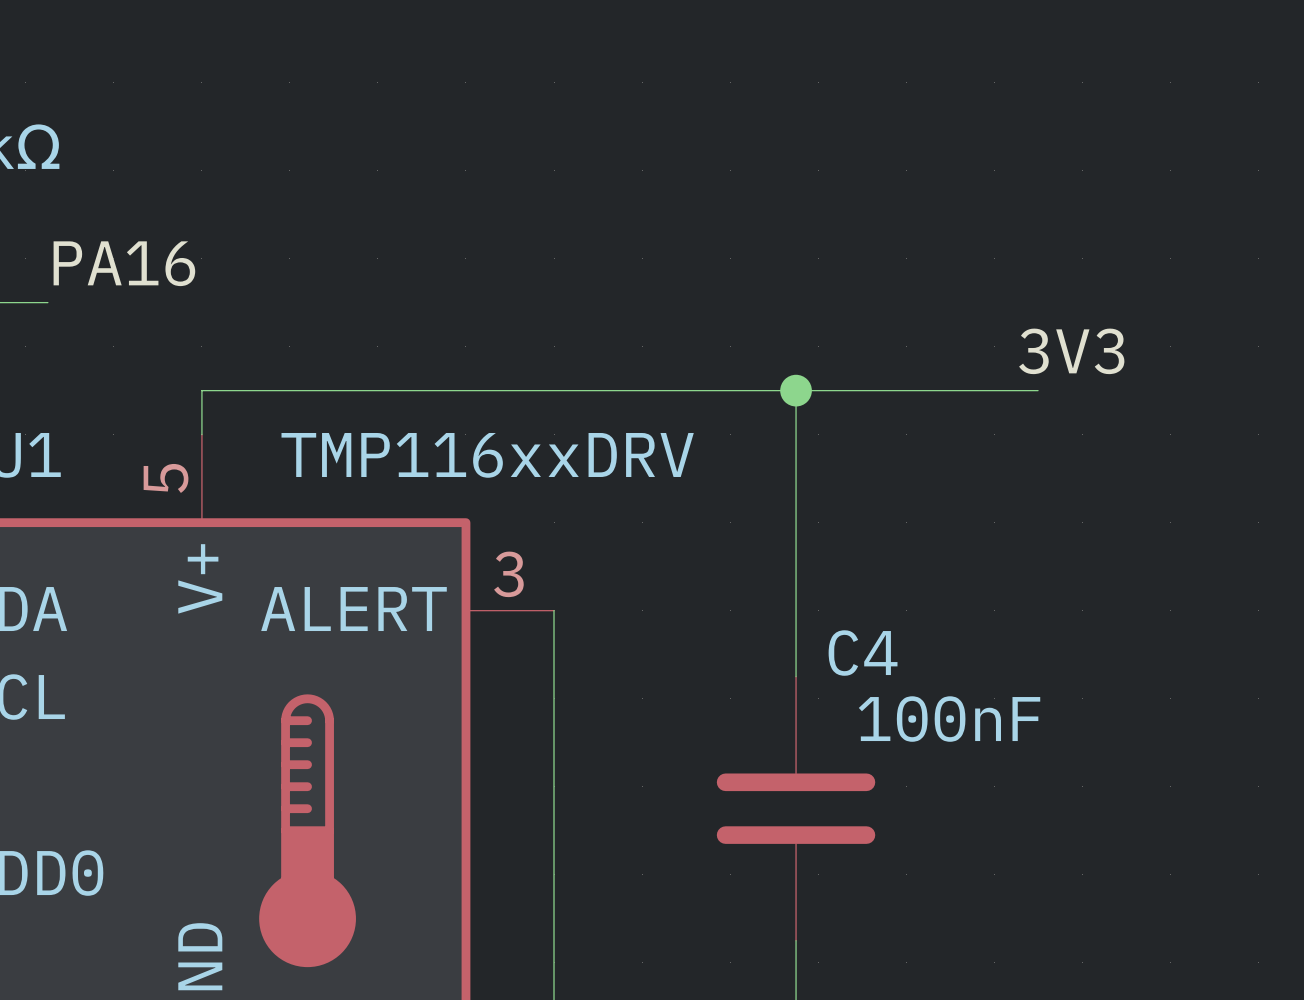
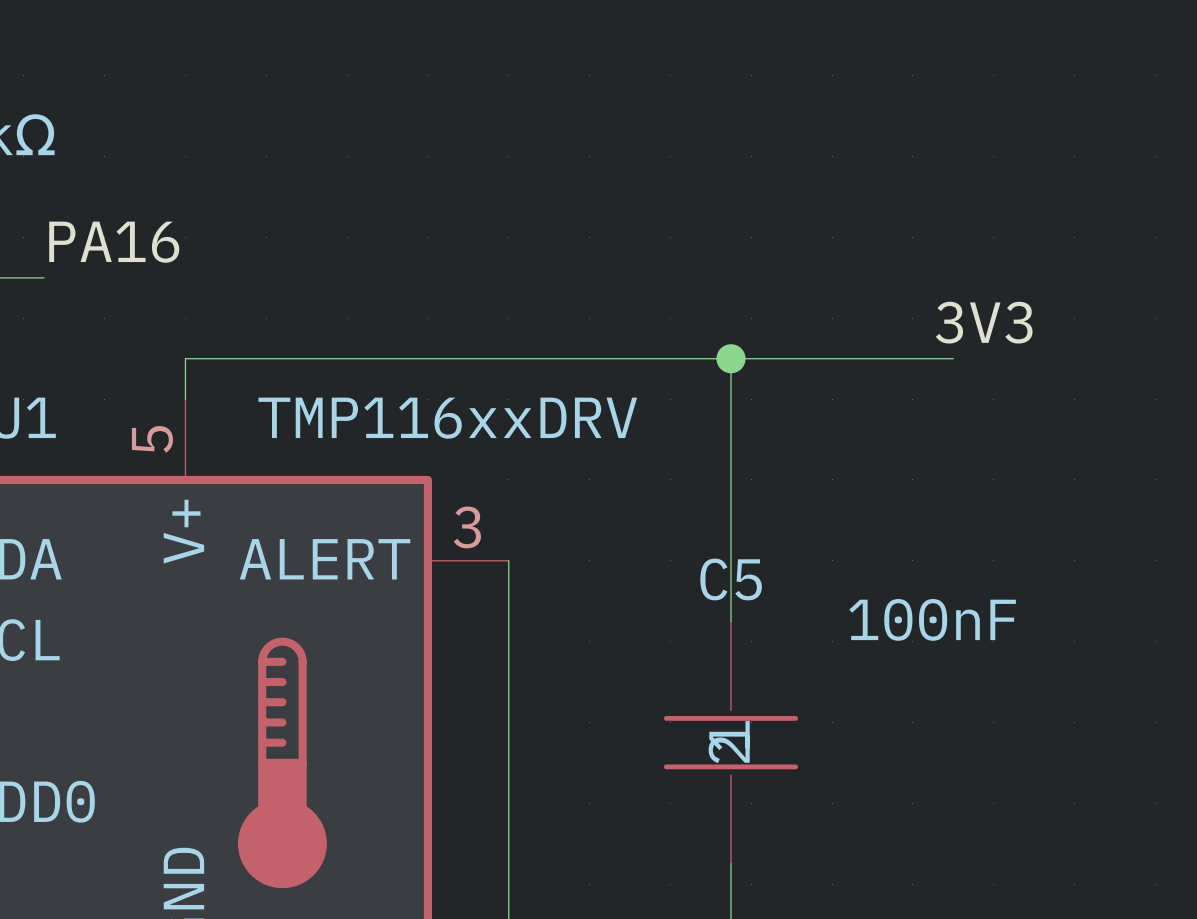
C4: 100nF (796, 808) -> none
C5: none -> 100nF (731, 742)

